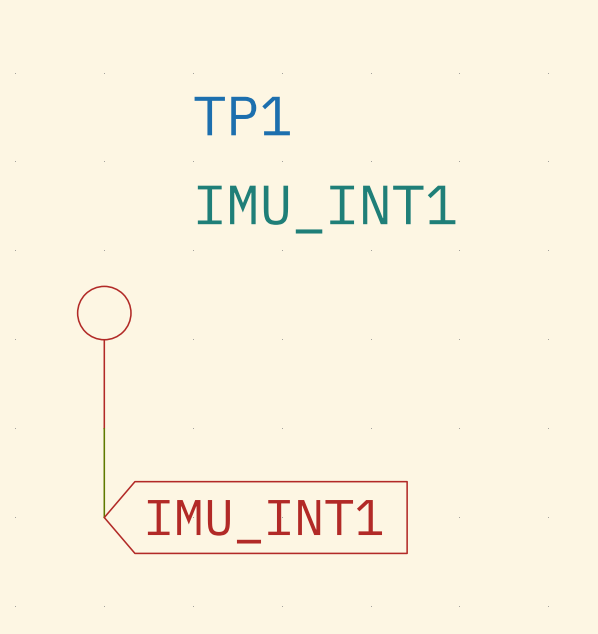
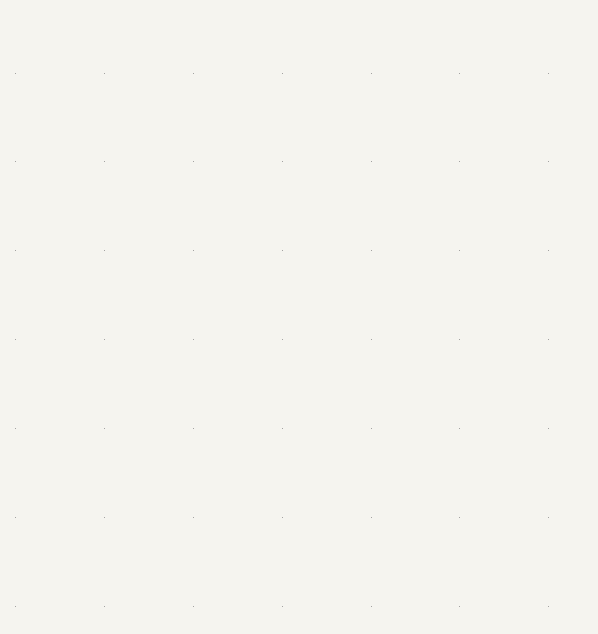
TP1: IMU_INT1 (104, 357) -> none
wire: (104, 428) (104, 517) -> none
global label: IMU_INT1 (264, 521) -> none

